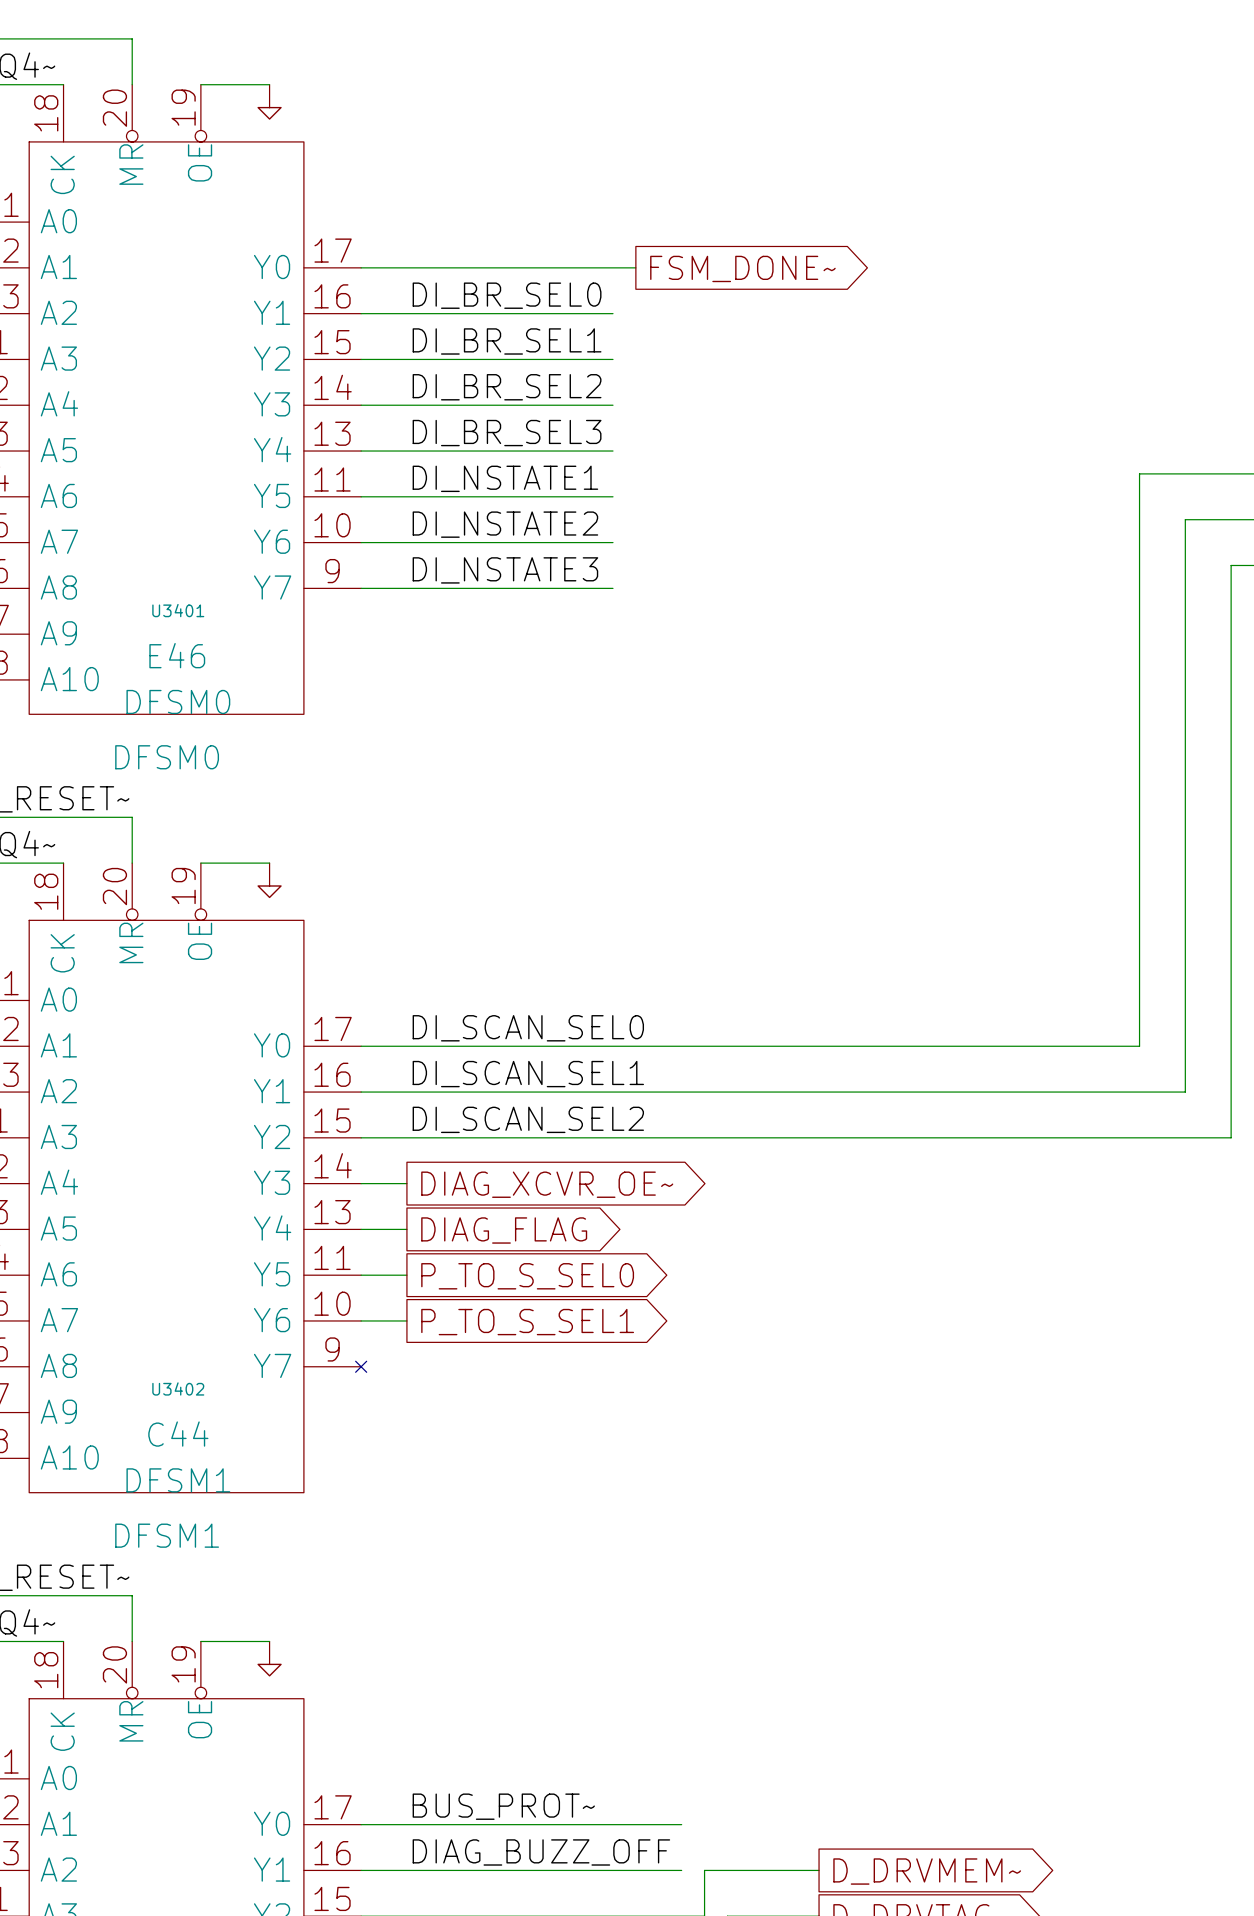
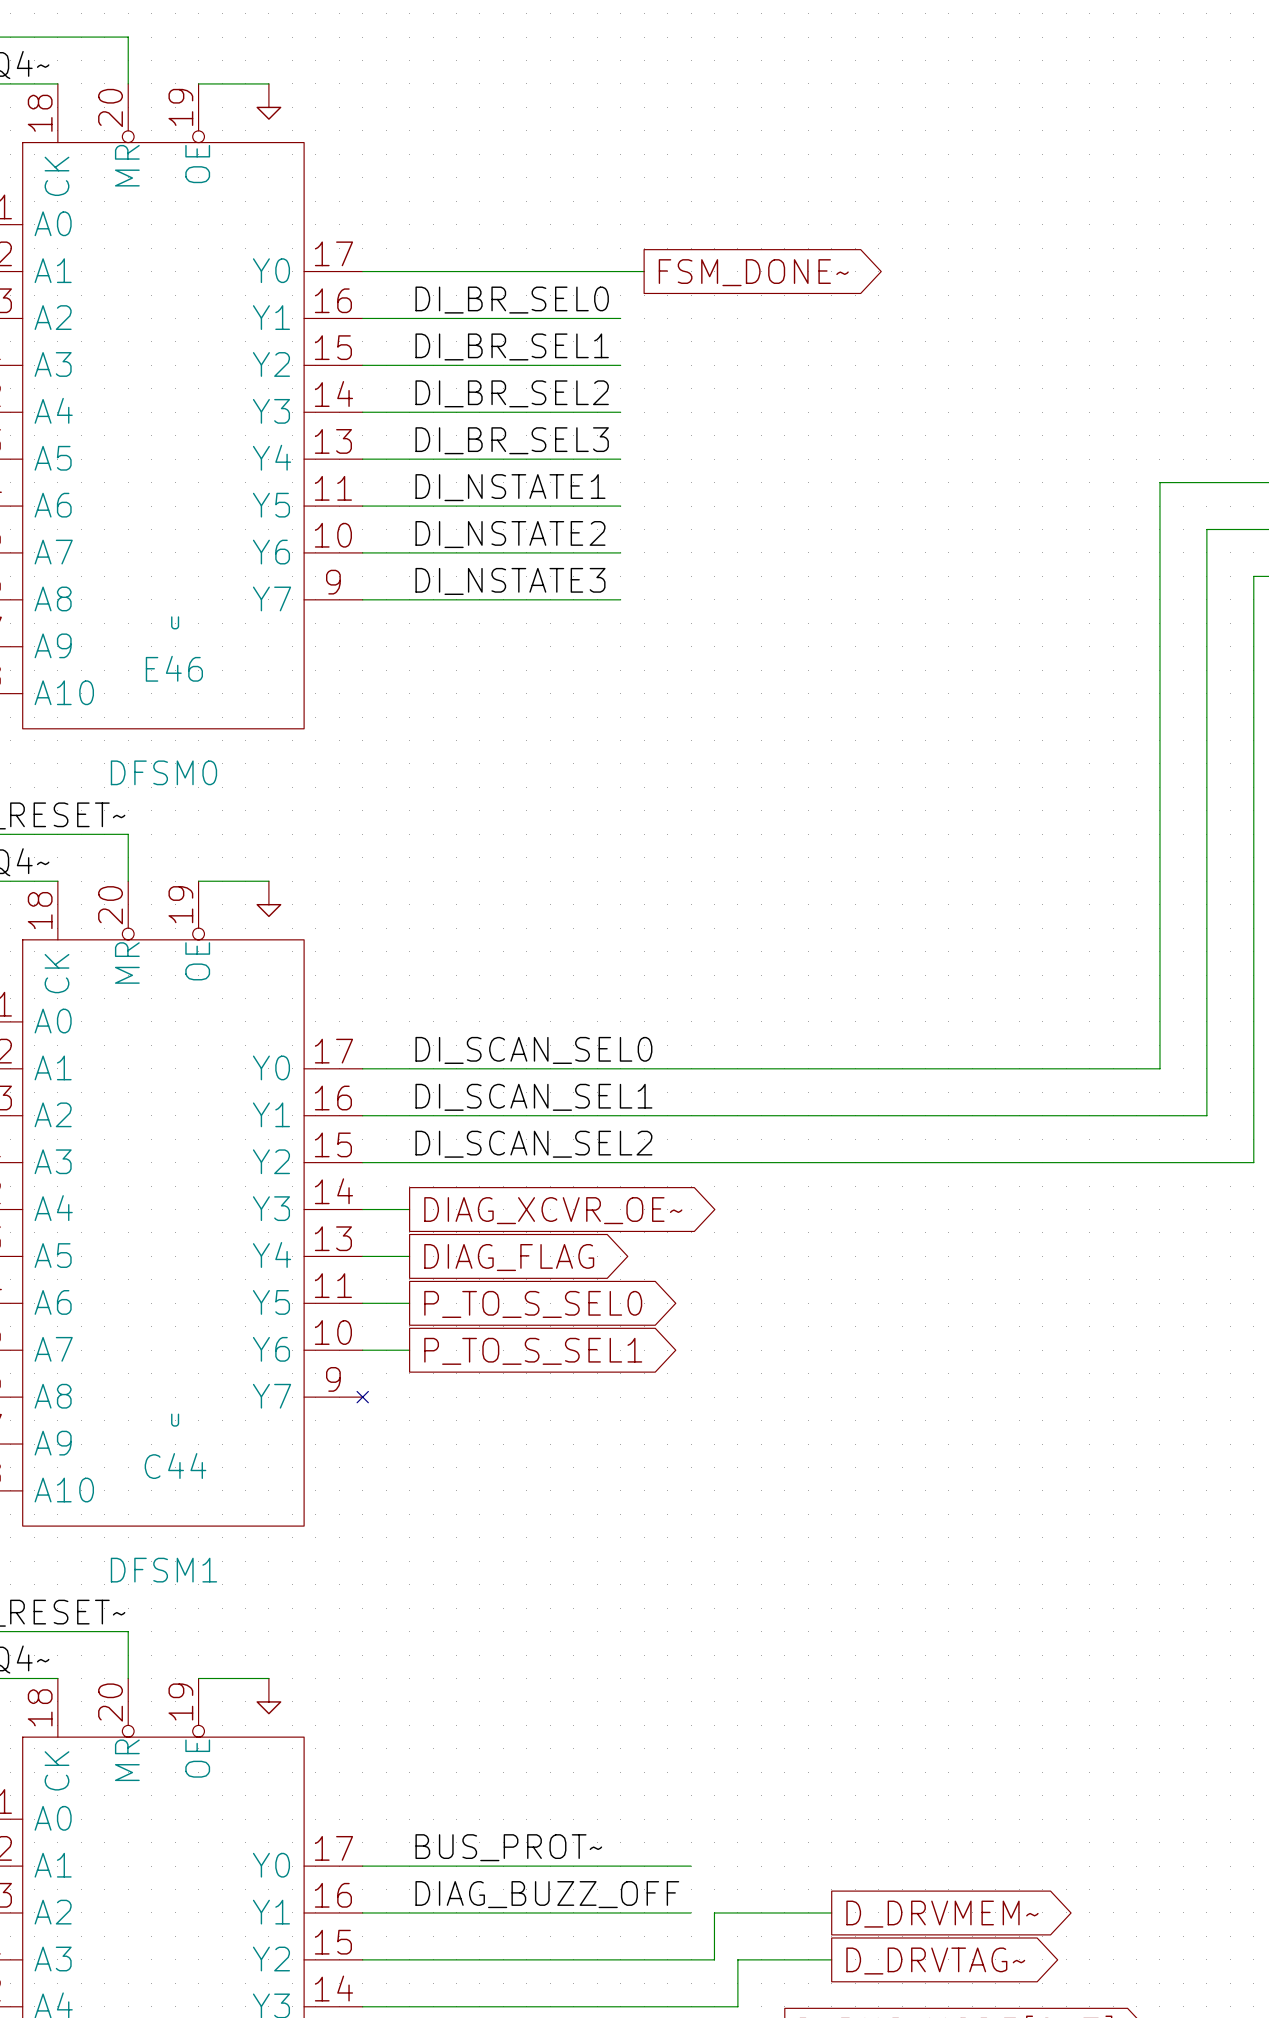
U3401 name: U3401 (178, 610) -> U (175, 622)
U3401 value: DFSM0 (178, 701) -> none
U3402 name: U3402 (178, 1388) -> U (175, 1420)
U3402 value: DFSM1 (178, 1480) -> none

